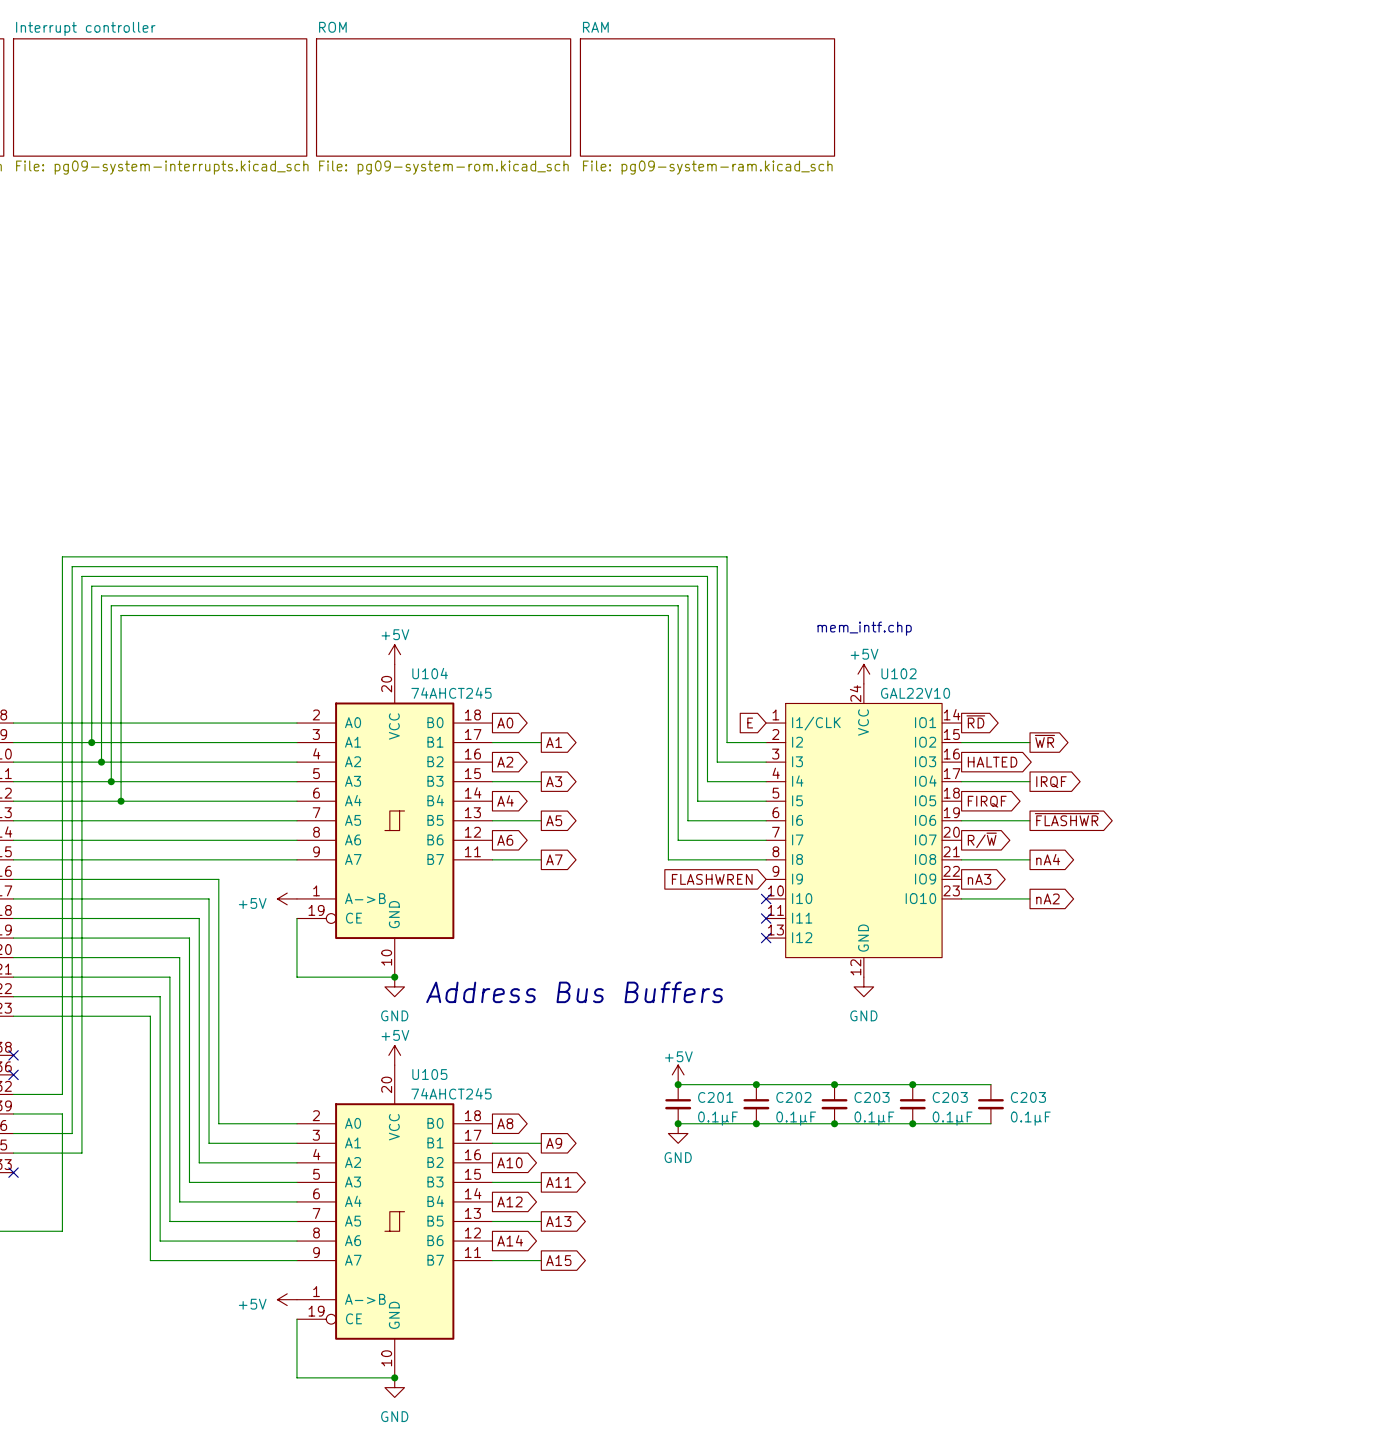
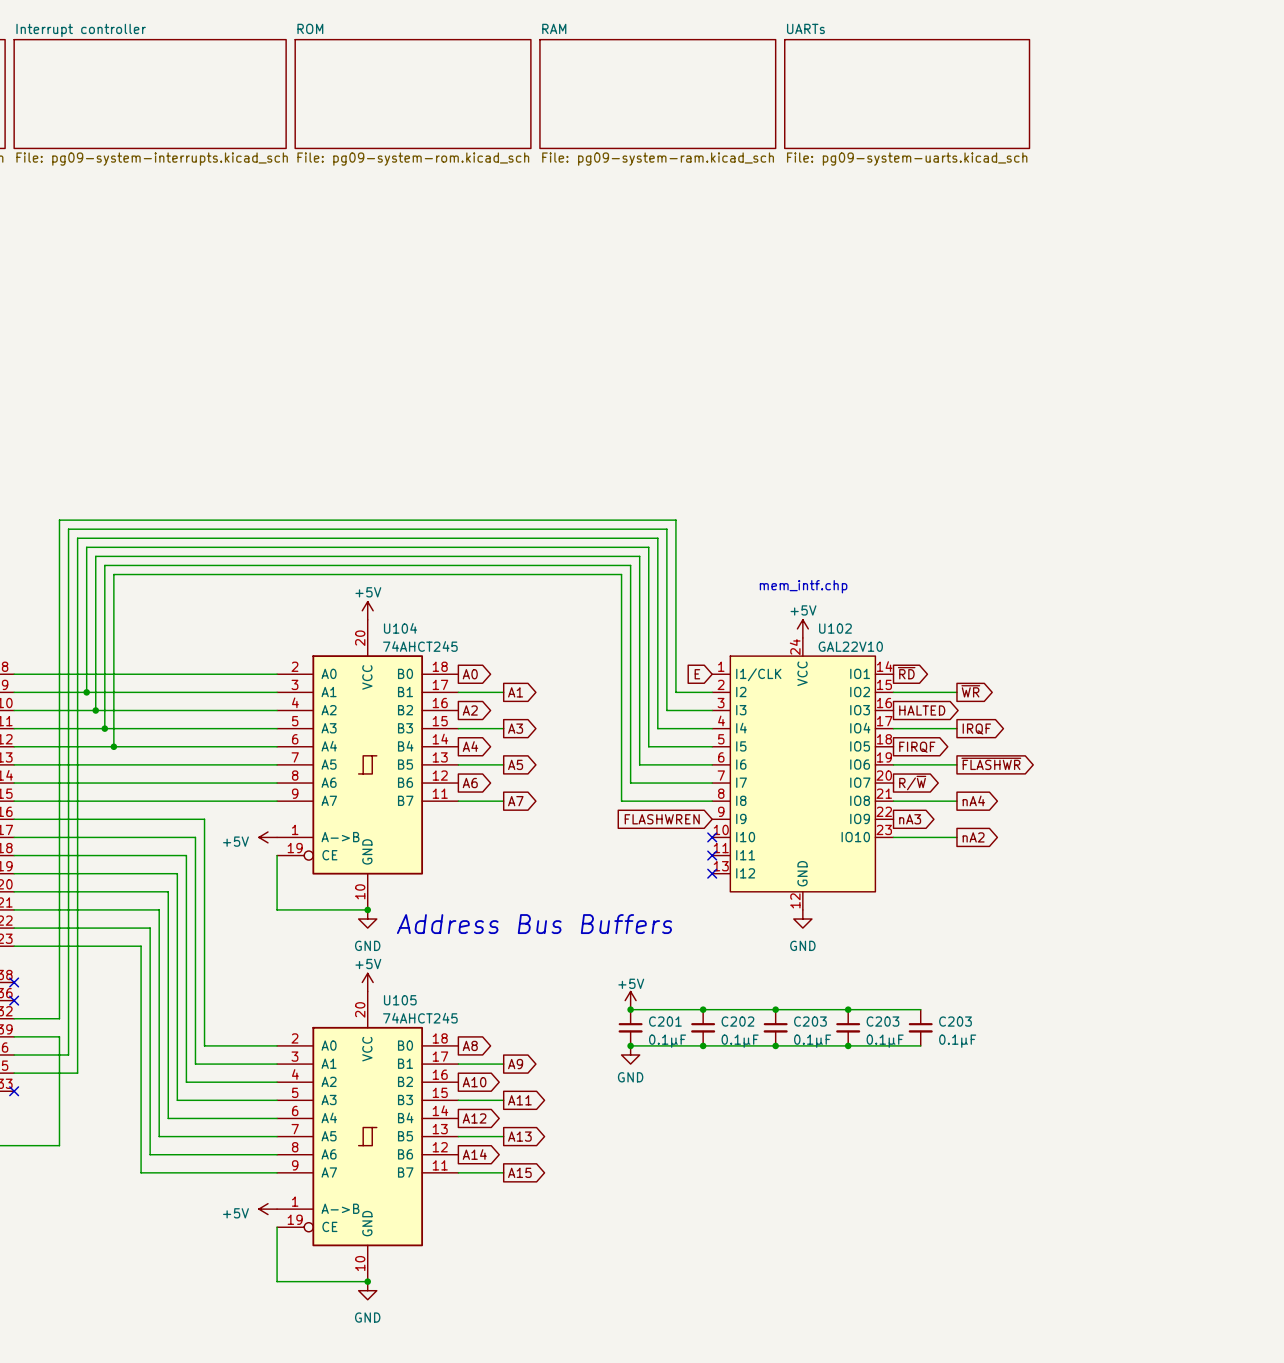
sheet UARTs: none -> File: pg09-system-uarts.kicad_sch (907, 94)

